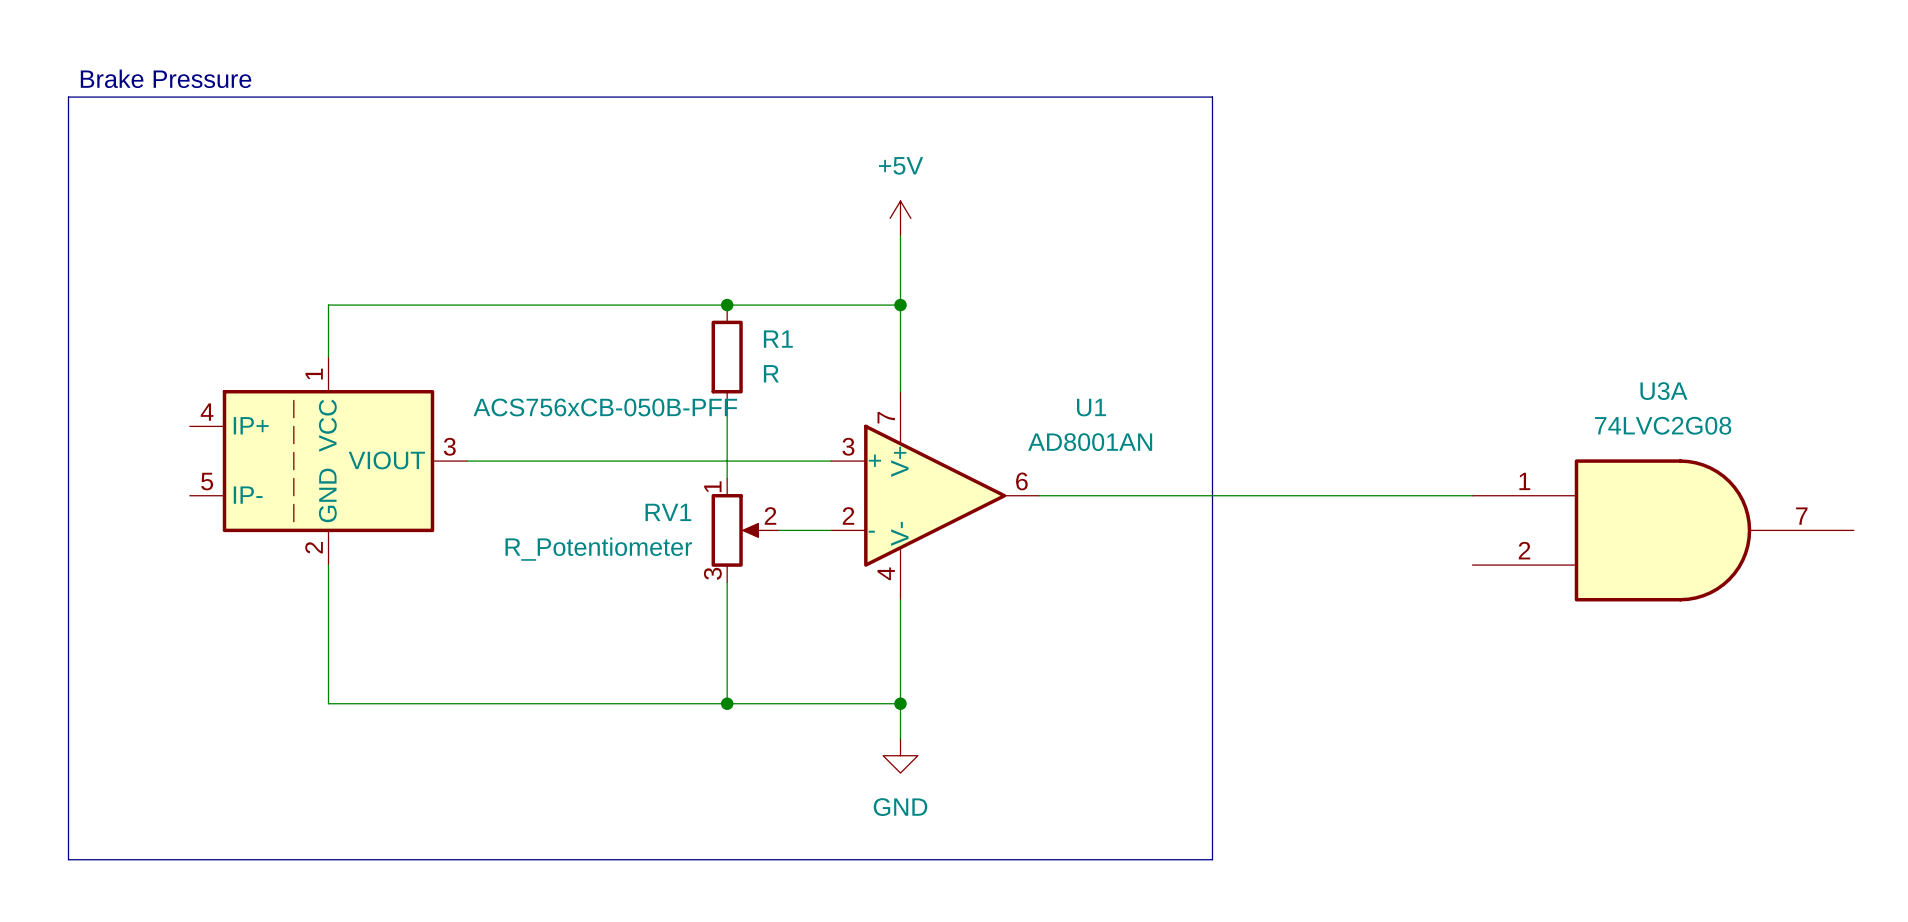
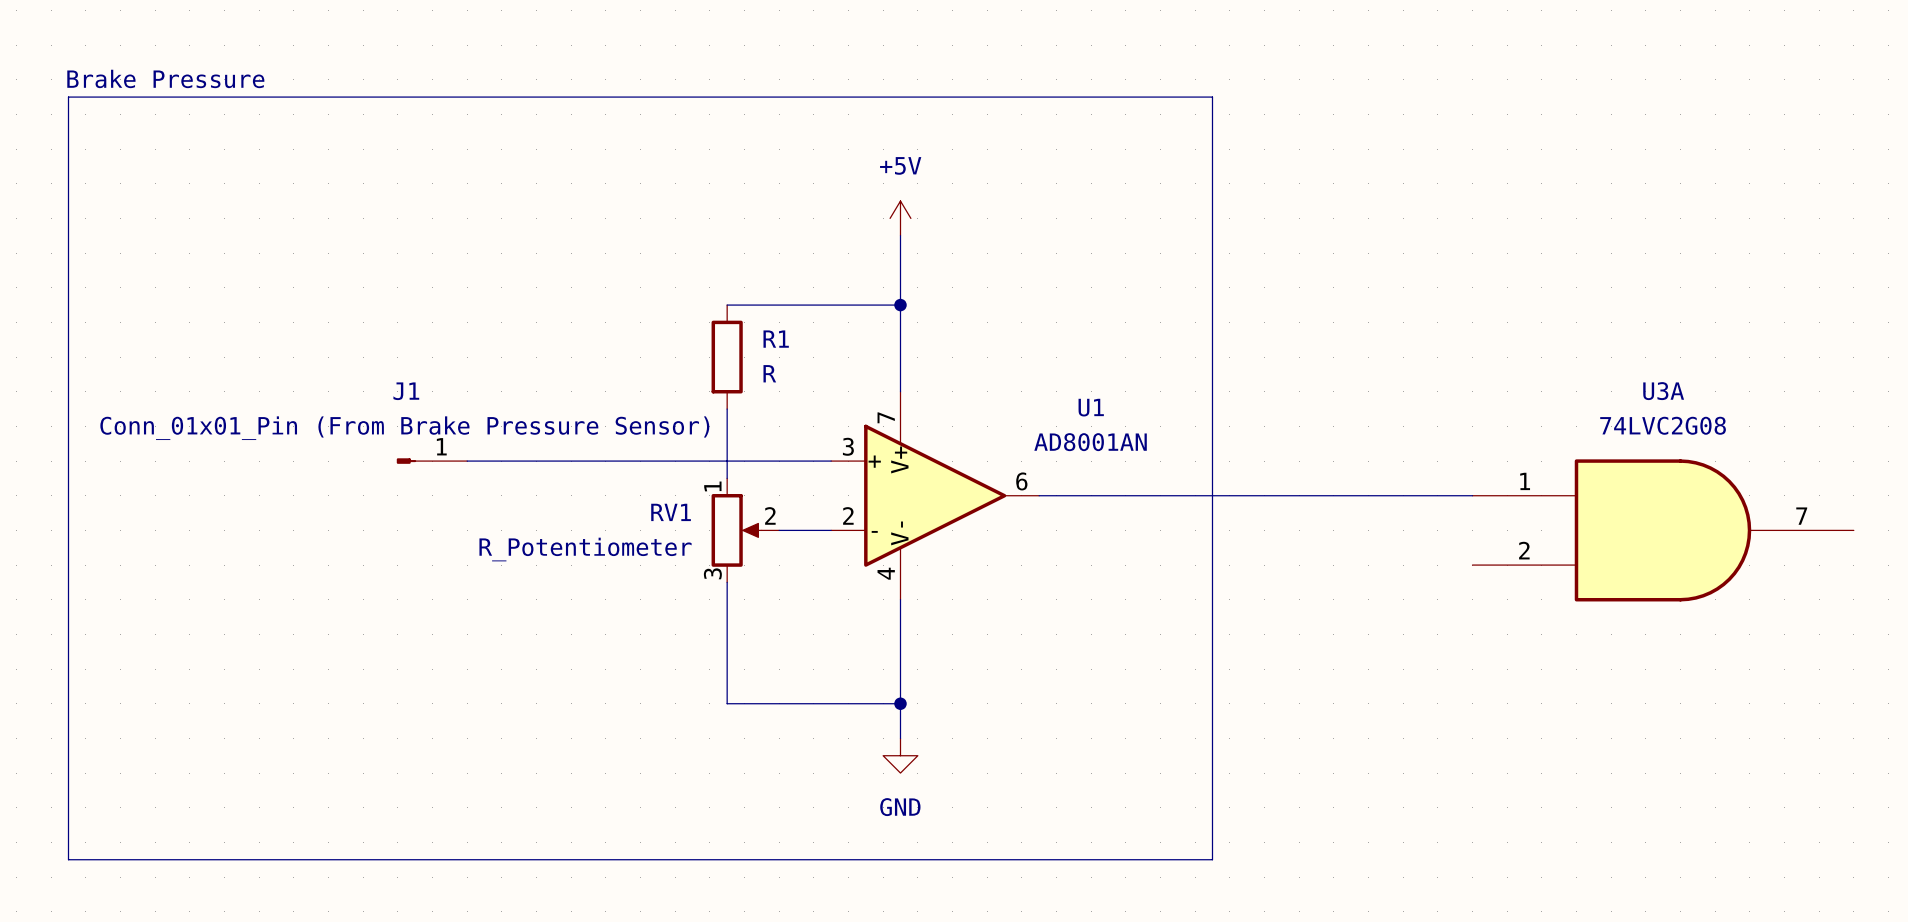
wire: (727, 305) (328, 305) (328, 357) -> none
junction: (727, 305) -> none
part: ACS756xCB-050B-PFF (328, 461) -> none
J1: none -> Conn_01x01_Pin (From Brake Pressure Sensor) (431, 461)
wire: (328, 565) (328, 703) (727, 703) -> none
junction: (727, 703) -> none

